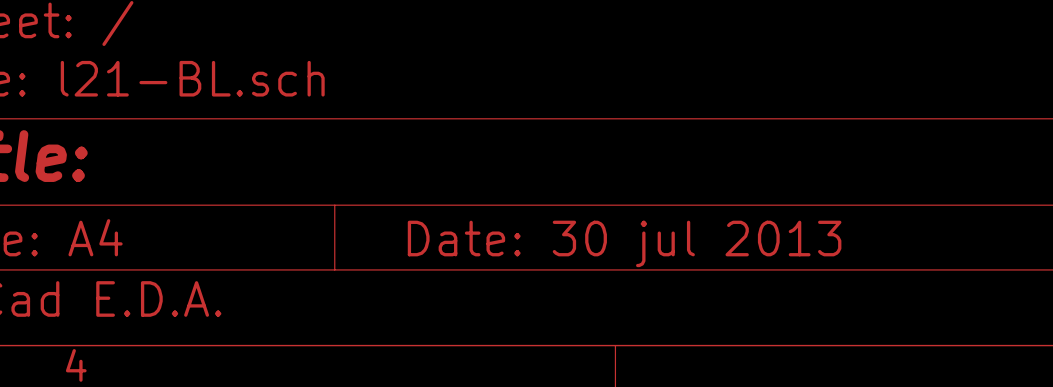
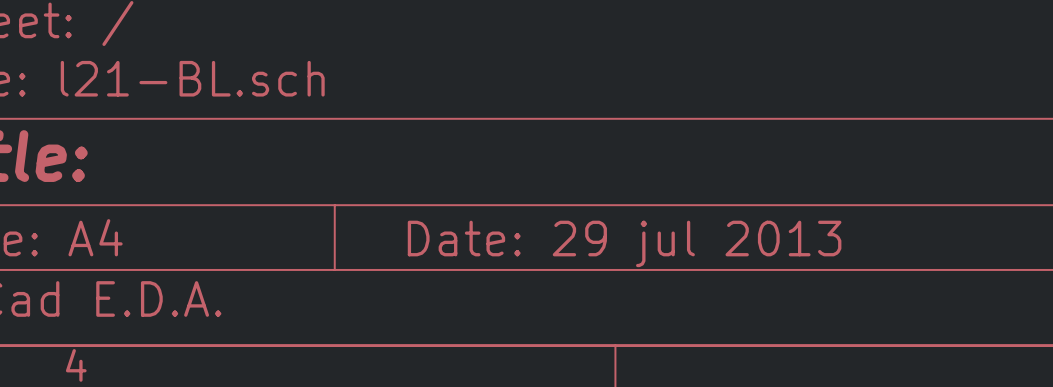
title block: Date: 30 jul 2013 (624, 243) -> Date: 29 jul 2013 (624, 243)

